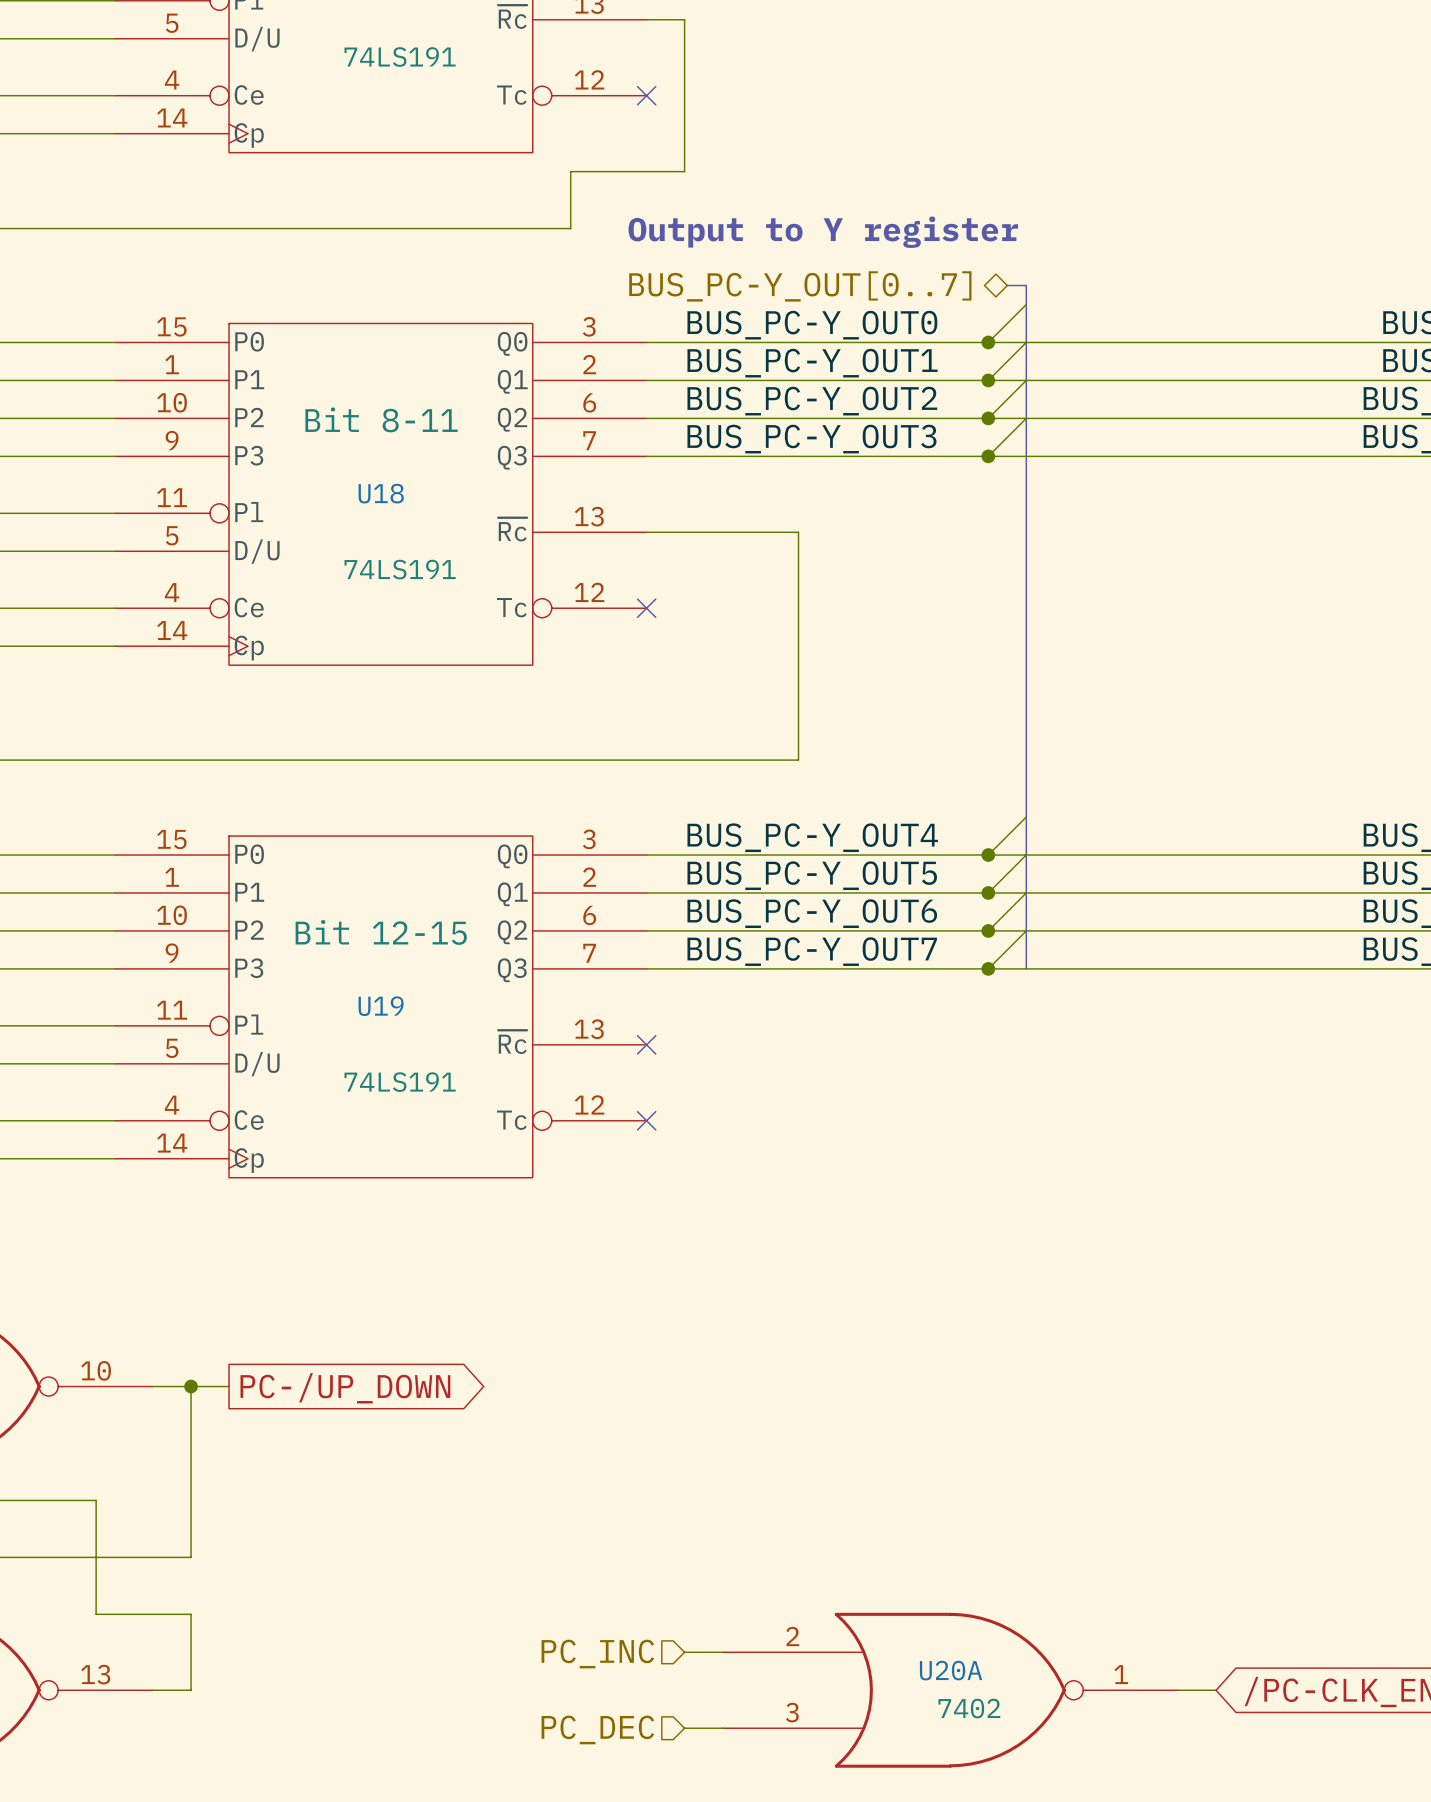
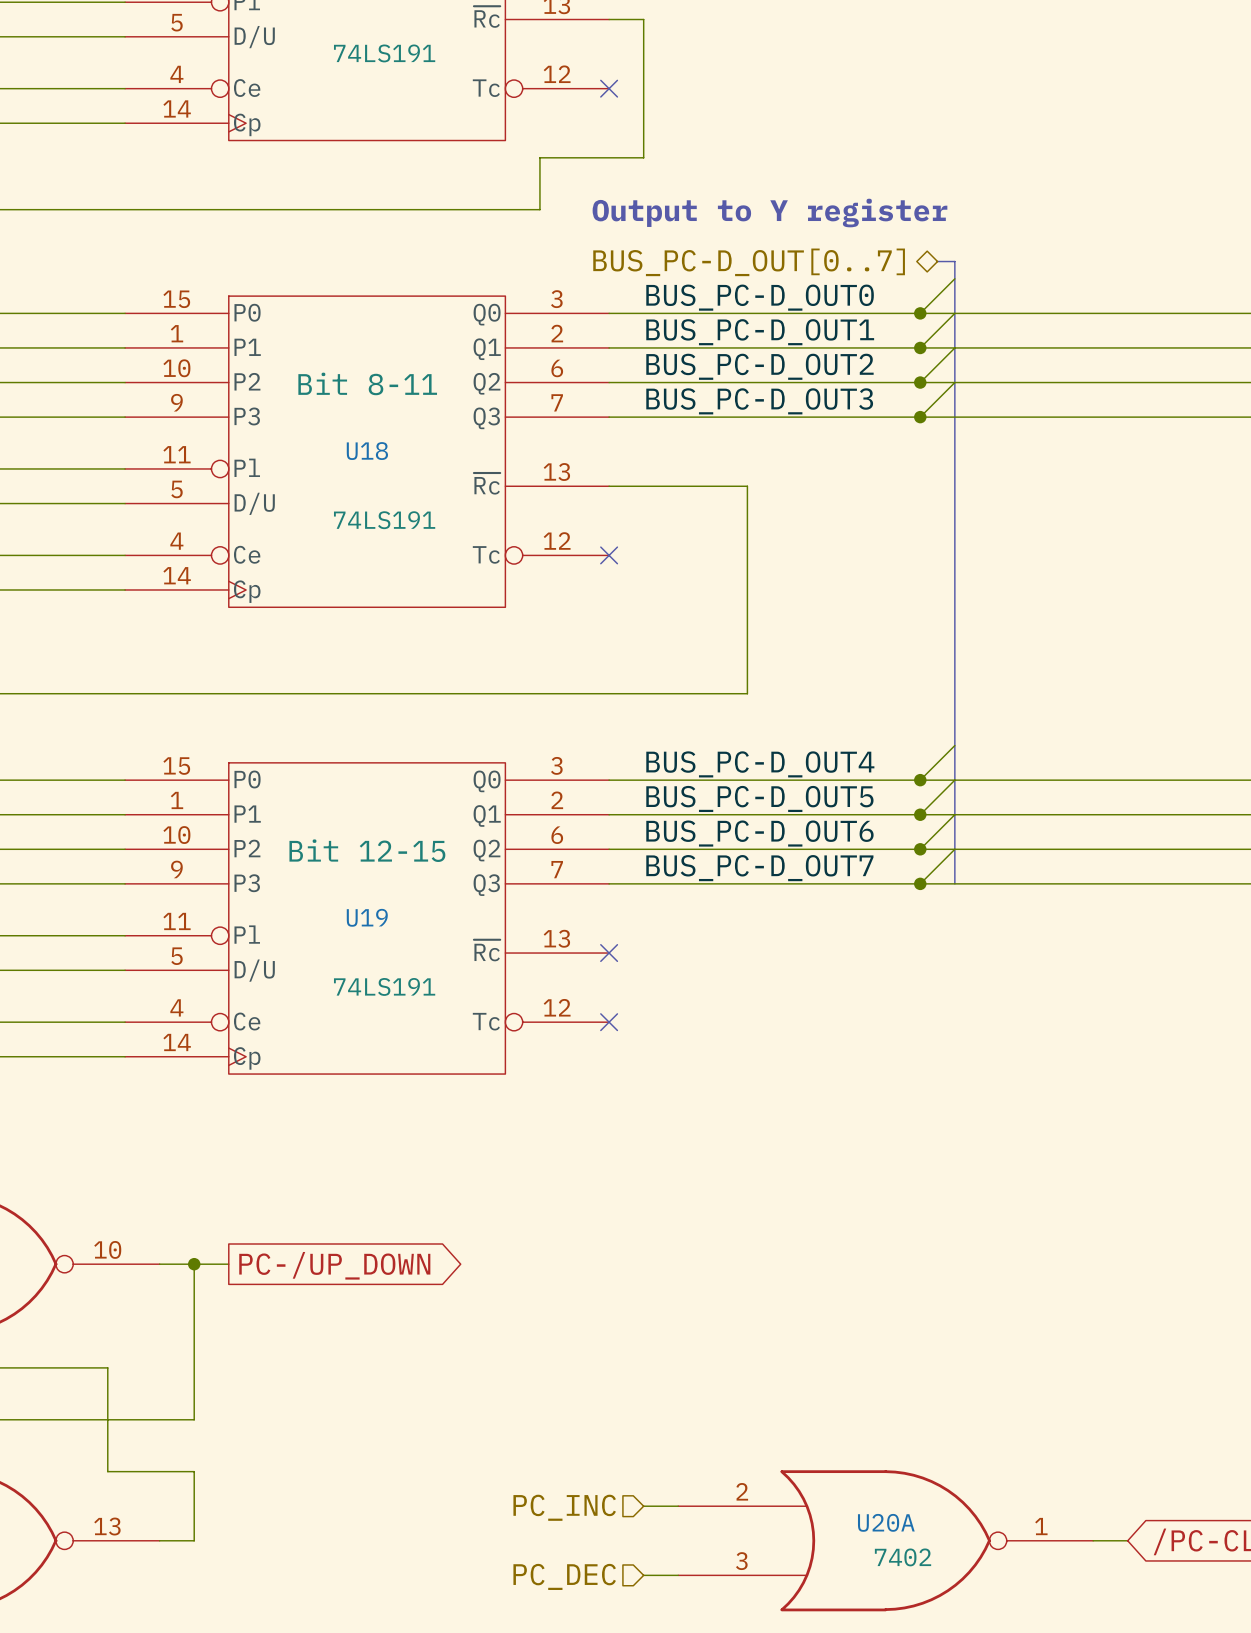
hierarchical label: BUS_PC-Y_OUT[0..7] (800, 286) -> BUS_PC-D_OUT[0..7] (749, 262)
label: BUS_PC-Y_OUT0 (812, 325) -> BUS_PC-D_OUT0 (760, 297)
label: BUS_PC-Y_OUT1 (812, 363) -> BUS_PC-D_OUT1 (760, 332)
label: BUS_PC-Y_OUT2 (812, 401) -> BUS_PC-D_OUT2 (759, 366)
label: BUS_PC-Y_OUT3 (811, 439) -> BUS_PC-D_OUT3 (759, 401)
label: BUS_PC-Y_OUT4 (812, 837) -> BUS_PC-D_OUT4 (760, 764)
label: BUS_PC-Y_OUT5 (812, 875) -> BUS_PC-D_OUT5 (759, 798)
label: BUS_PC-Y_OUT6 (812, 913) -> BUS_PC-D_OUT6 (759, 833)
label: BUS_PC-Y_OUT7 (812, 951) -> BUS_PC-D_OUT7 (759, 868)

